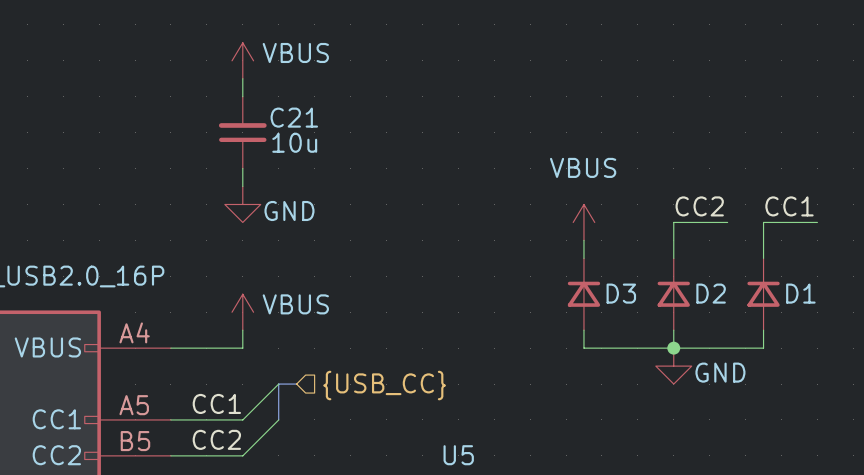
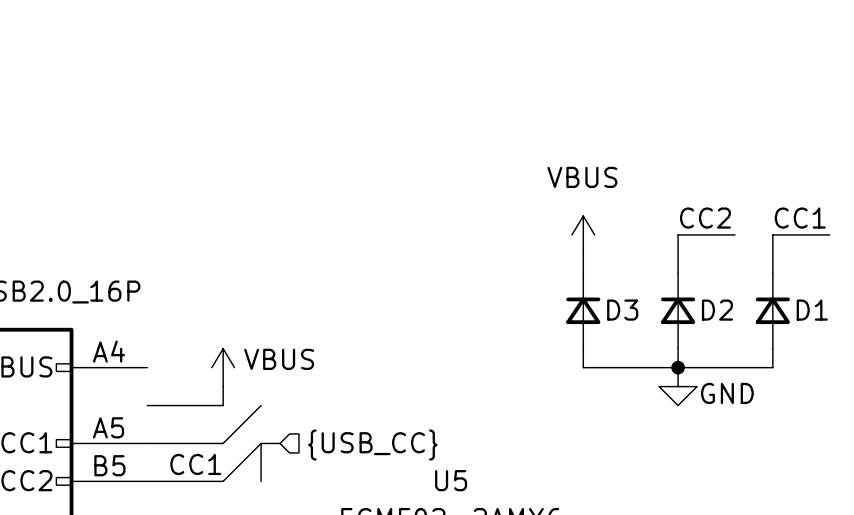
power symbol: VBUS (242, 60) -> none
wire: (242, 78) (242, 96) -> none
C21: 10u (242, 132) -> none
wire: (242, 168) (242, 186) -> none
power symbol: GND (242, 204) -> none
power symbol position: VBUS (242, 312) -> VBUS (223, 367)
wire: (242, 330) (242, 348) (170, 348) -> (223, 386) (223, 405) (147, 405)
bus: (296, 384) (278, 384) (278, 419) -> (280, 443) (261, 443) (261, 481)
hierarchical label position: {USB_CC} (384, 385) -> {USB_CC} (372, 445)
label: CC1 (216, 403) -> none
label: CC2 (216, 439) -> CC1 (195, 464)

